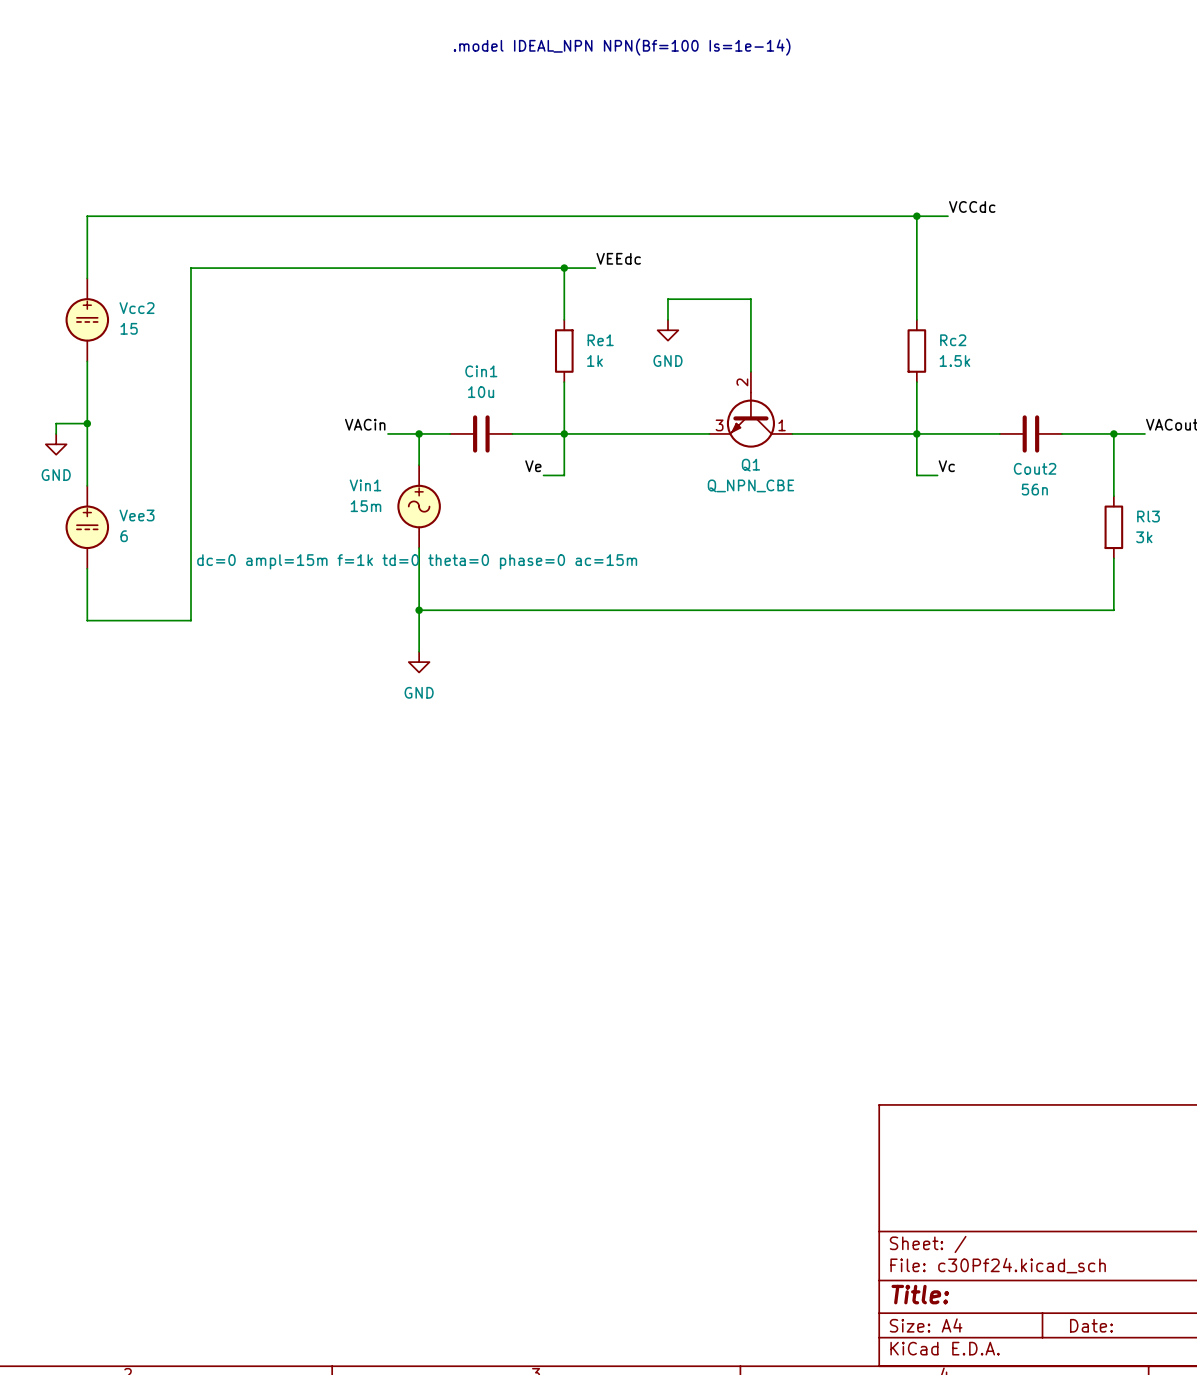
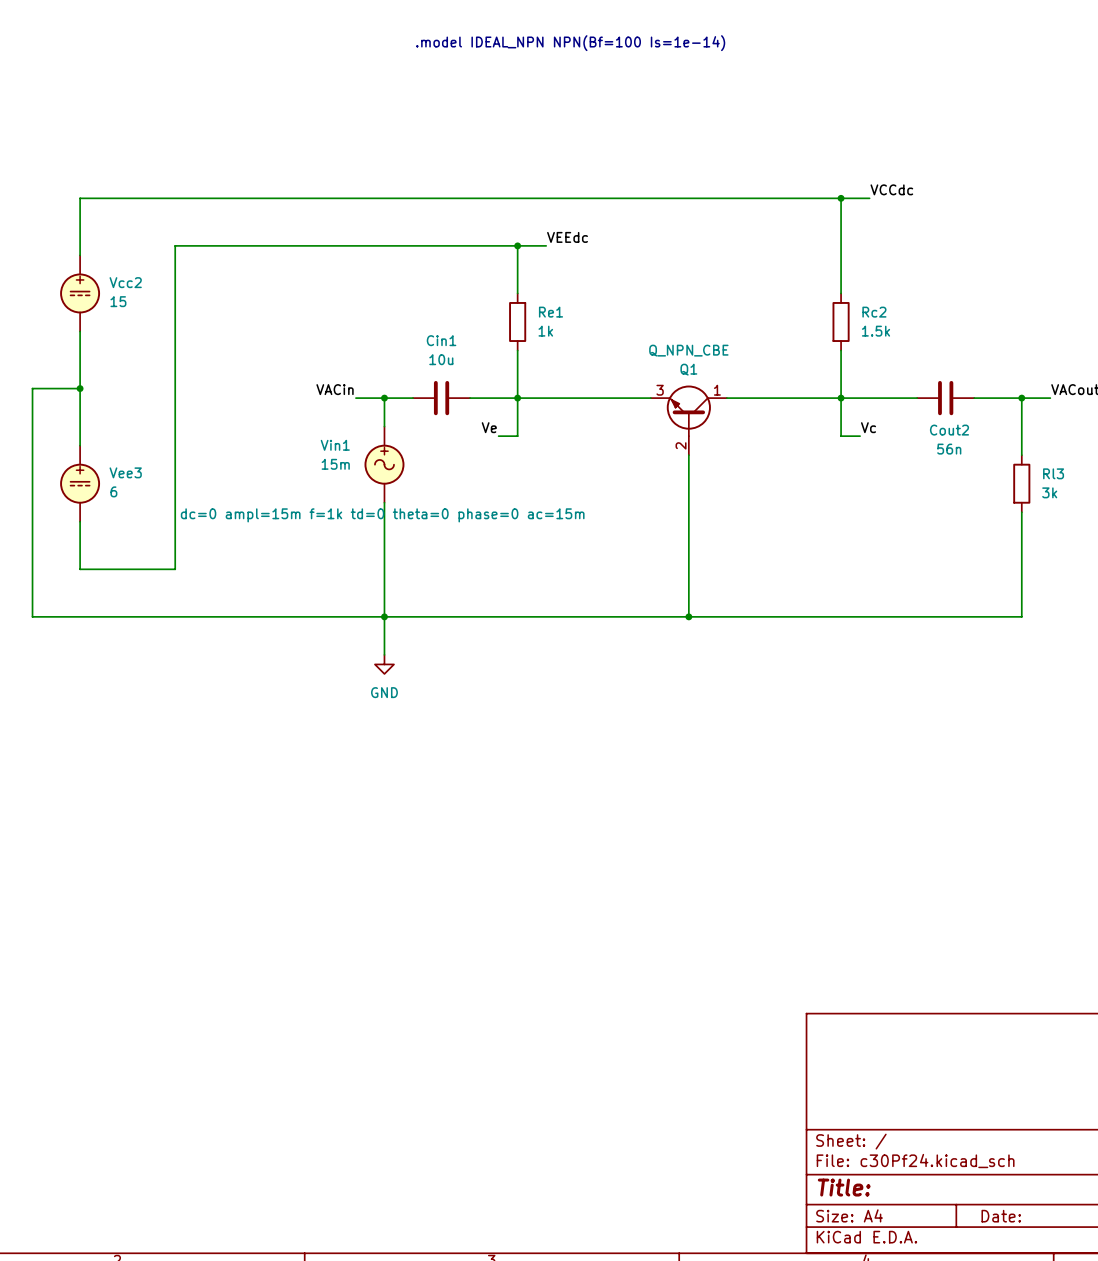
wire: (667, 319) (667, 299) (750, 299) (750, 371) -> none
power symbol: GND (667, 330) -> none
Q1 flip: as is (750, 420) -> up-down (688, 410)
wire: (56, 423) (56, 433) -> none
power symbol: GND (56, 444) -> none
wire: none -> (688, 455) (688, 616)
wire: (419, 610) (1113, 610) -> (51, 388) (32, 388) (32, 616) (1021, 616) (1021, 559)
junction: (419, 610) -> none
wire: none -> (384, 597) (384, 654)
power symbol position: GND (419, 662) -> GND (384, 664)
junction: none -> (384, 616)
junction: none -> (688, 616)

